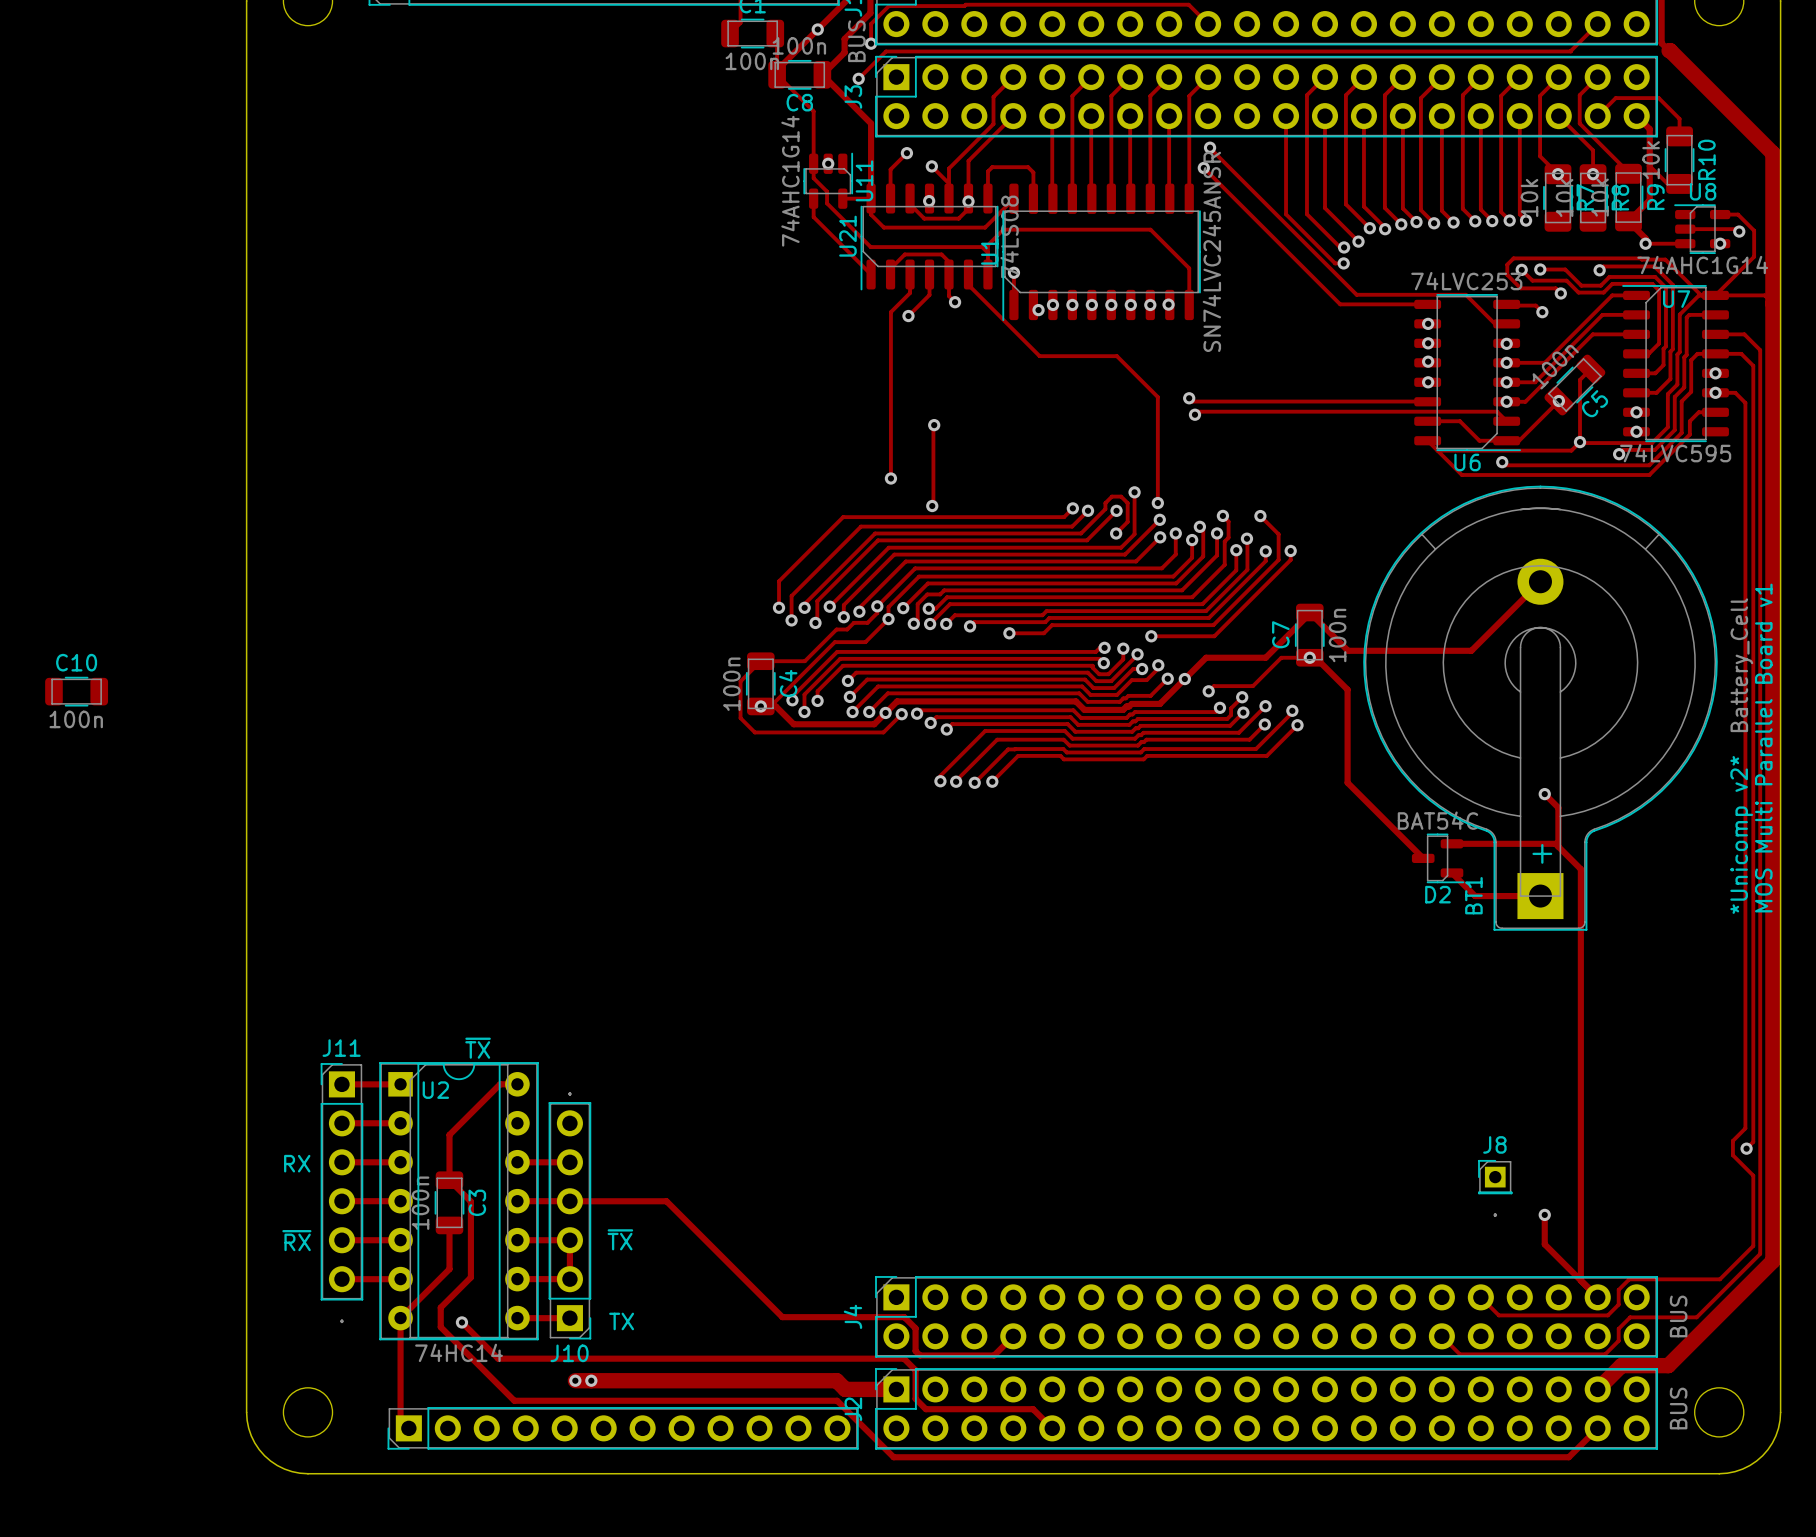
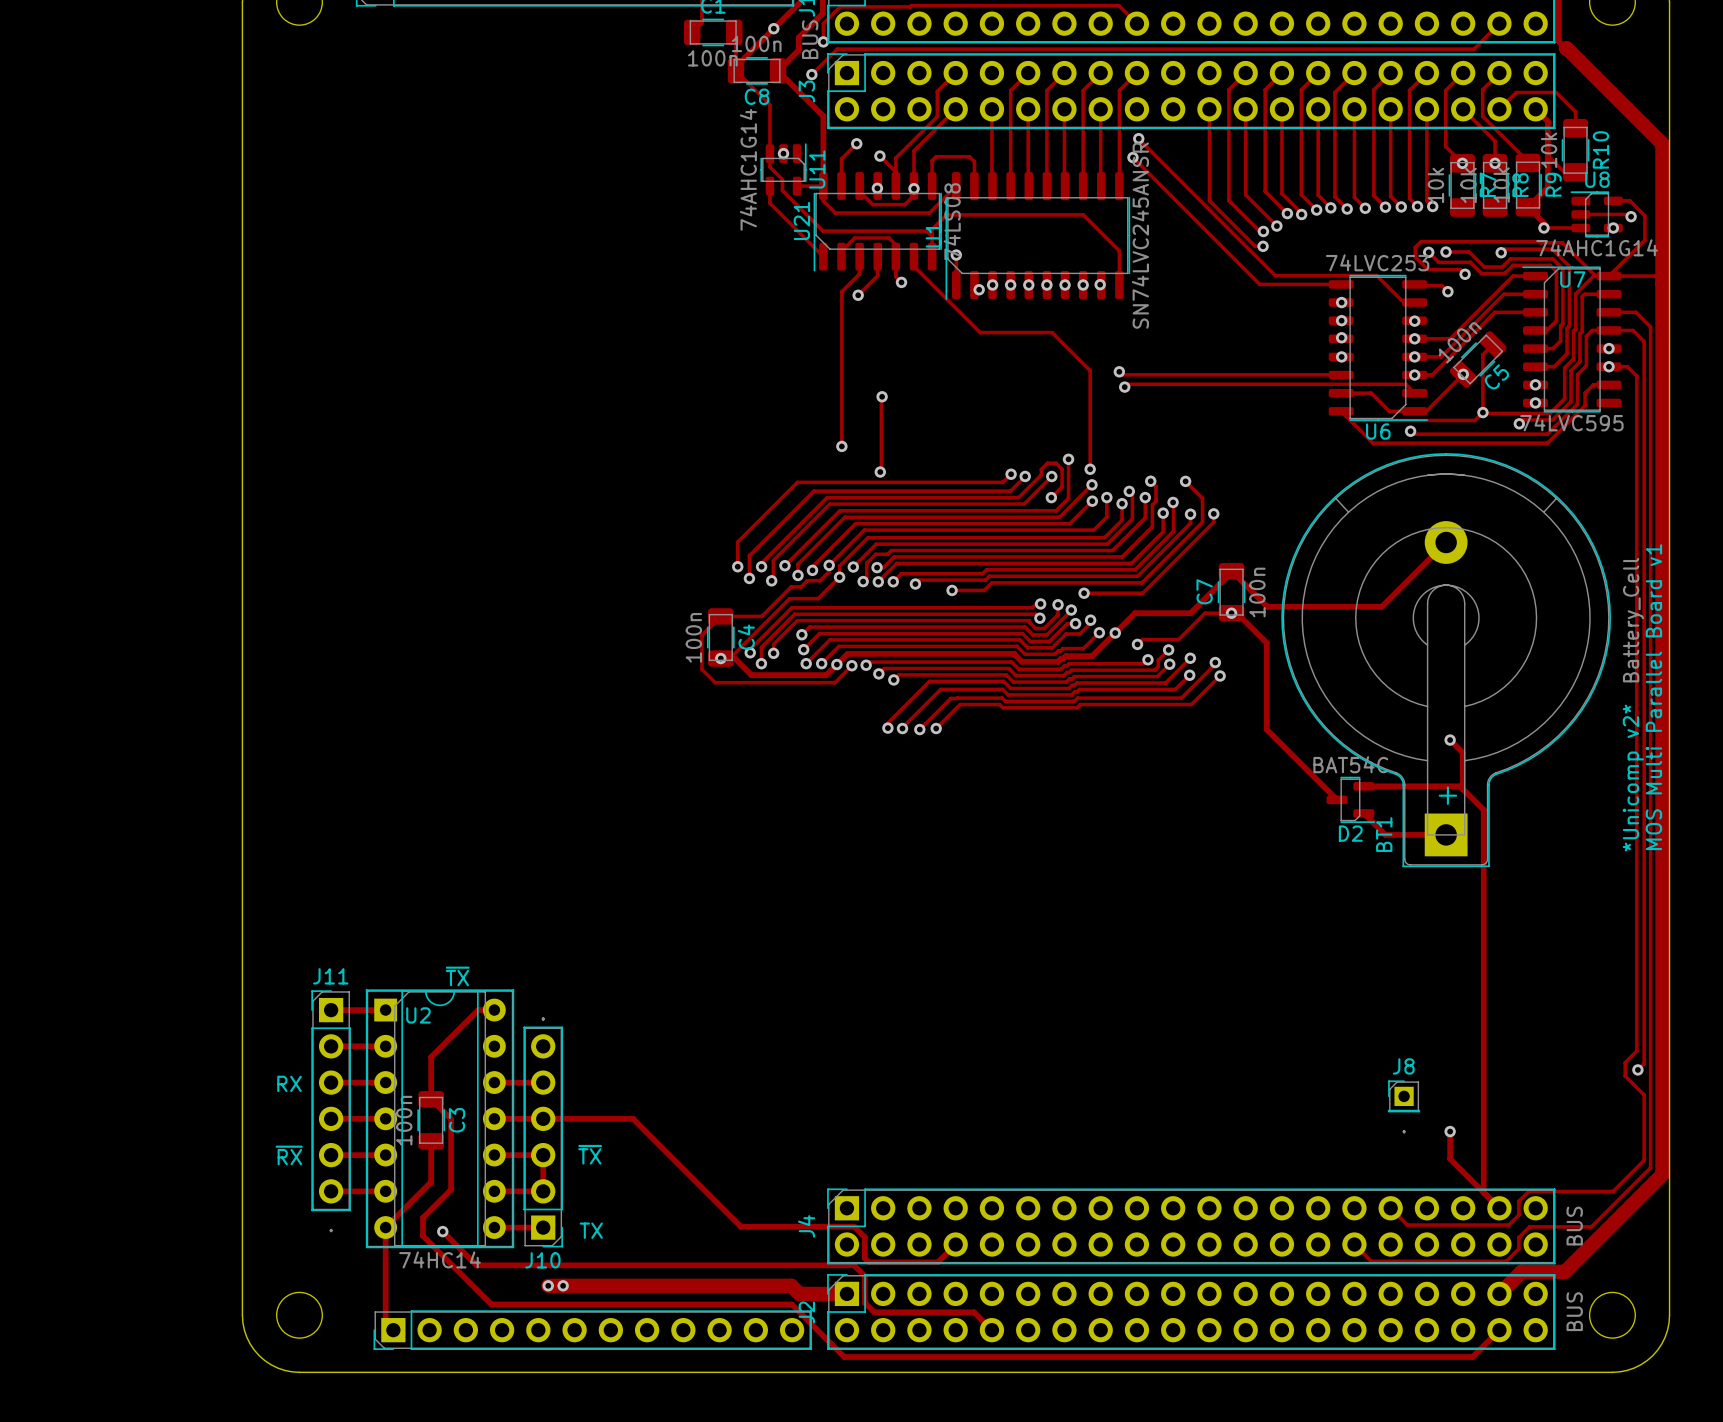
C10: 100n (76, 691) -> none

